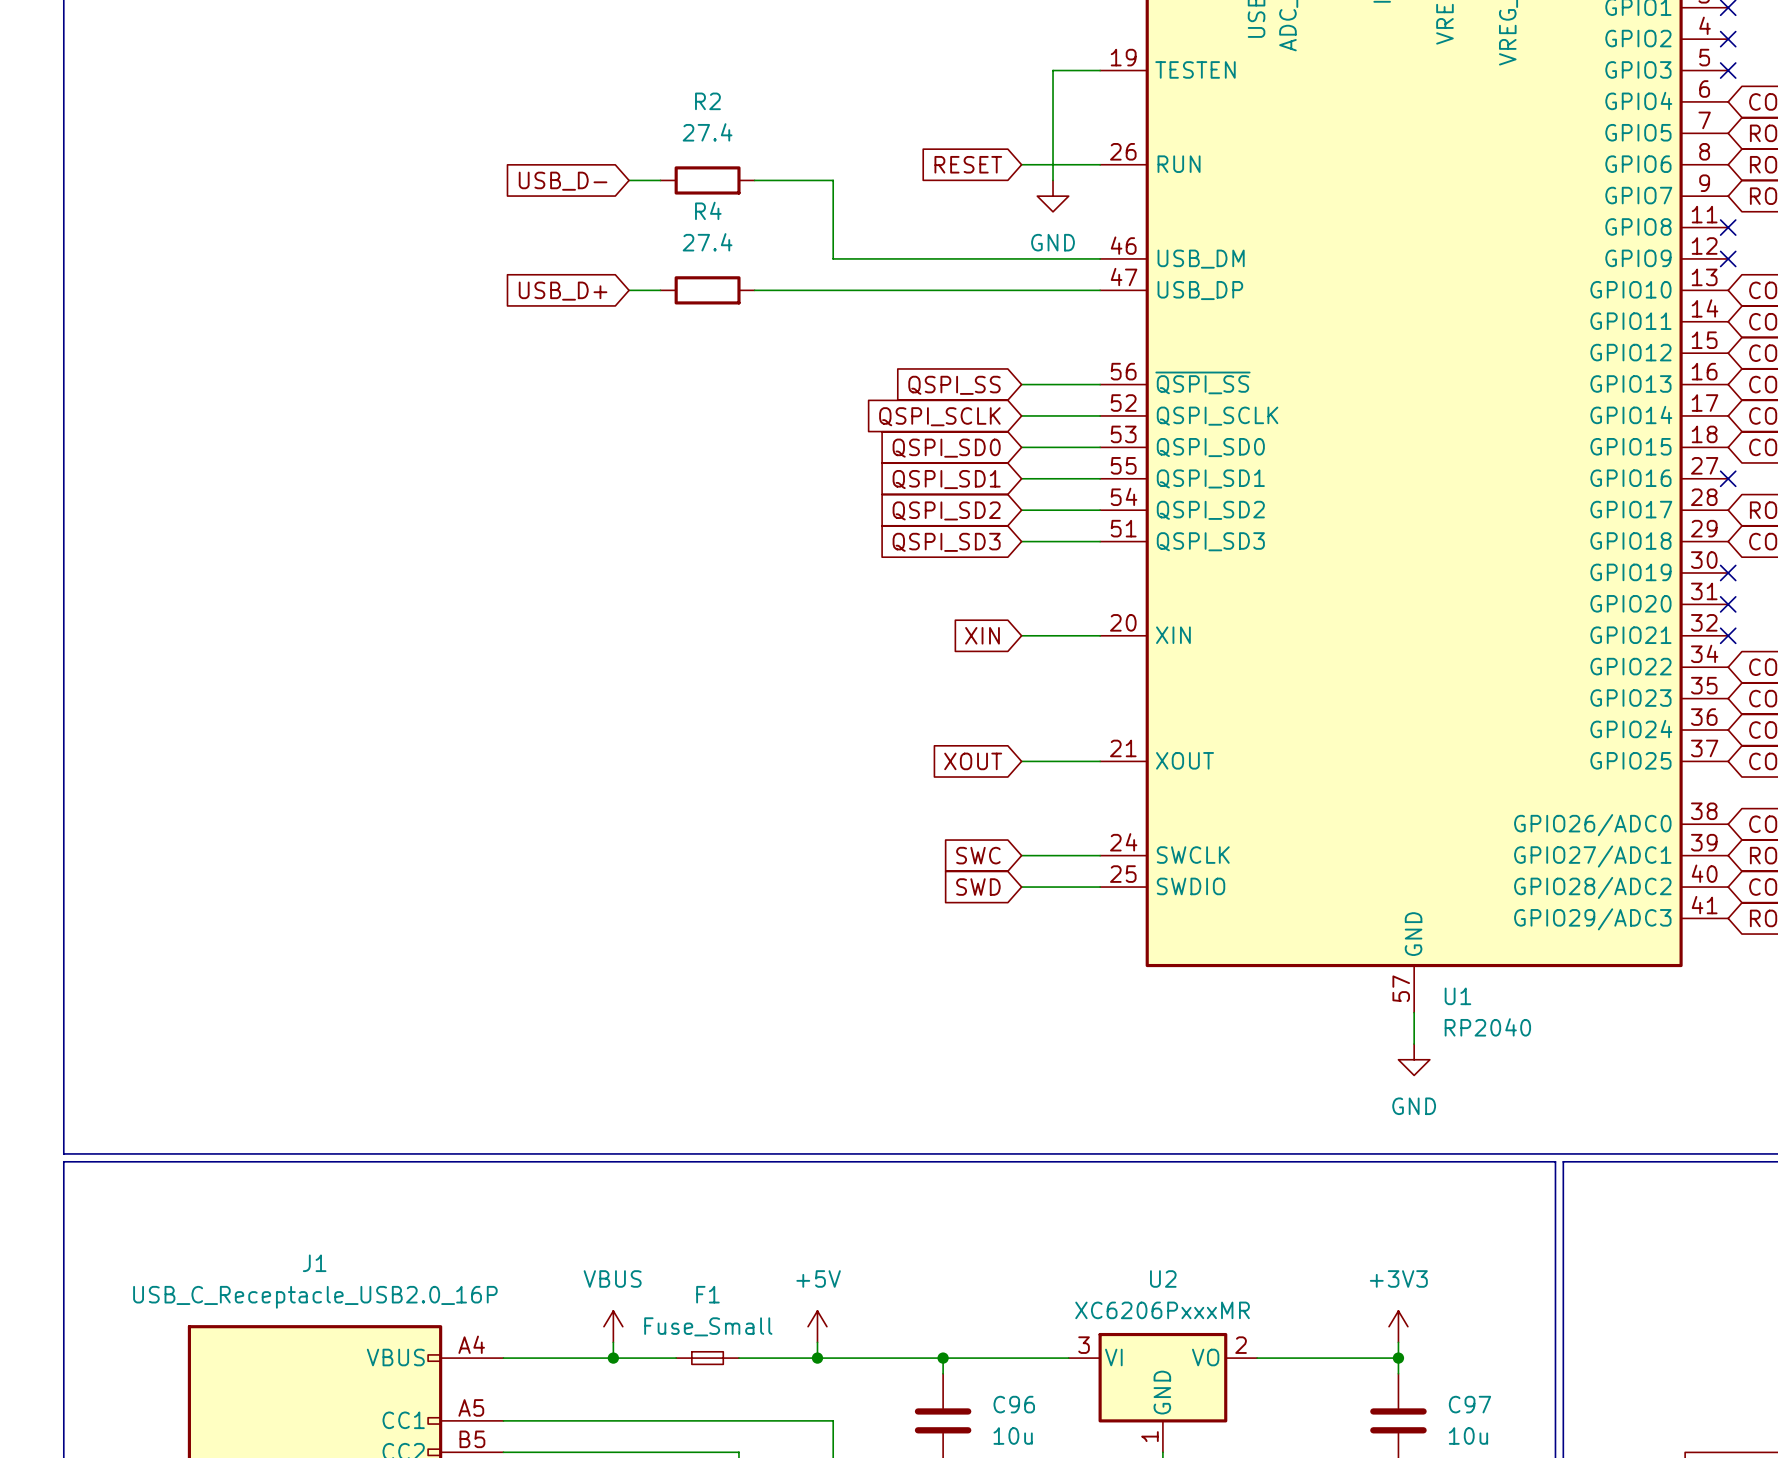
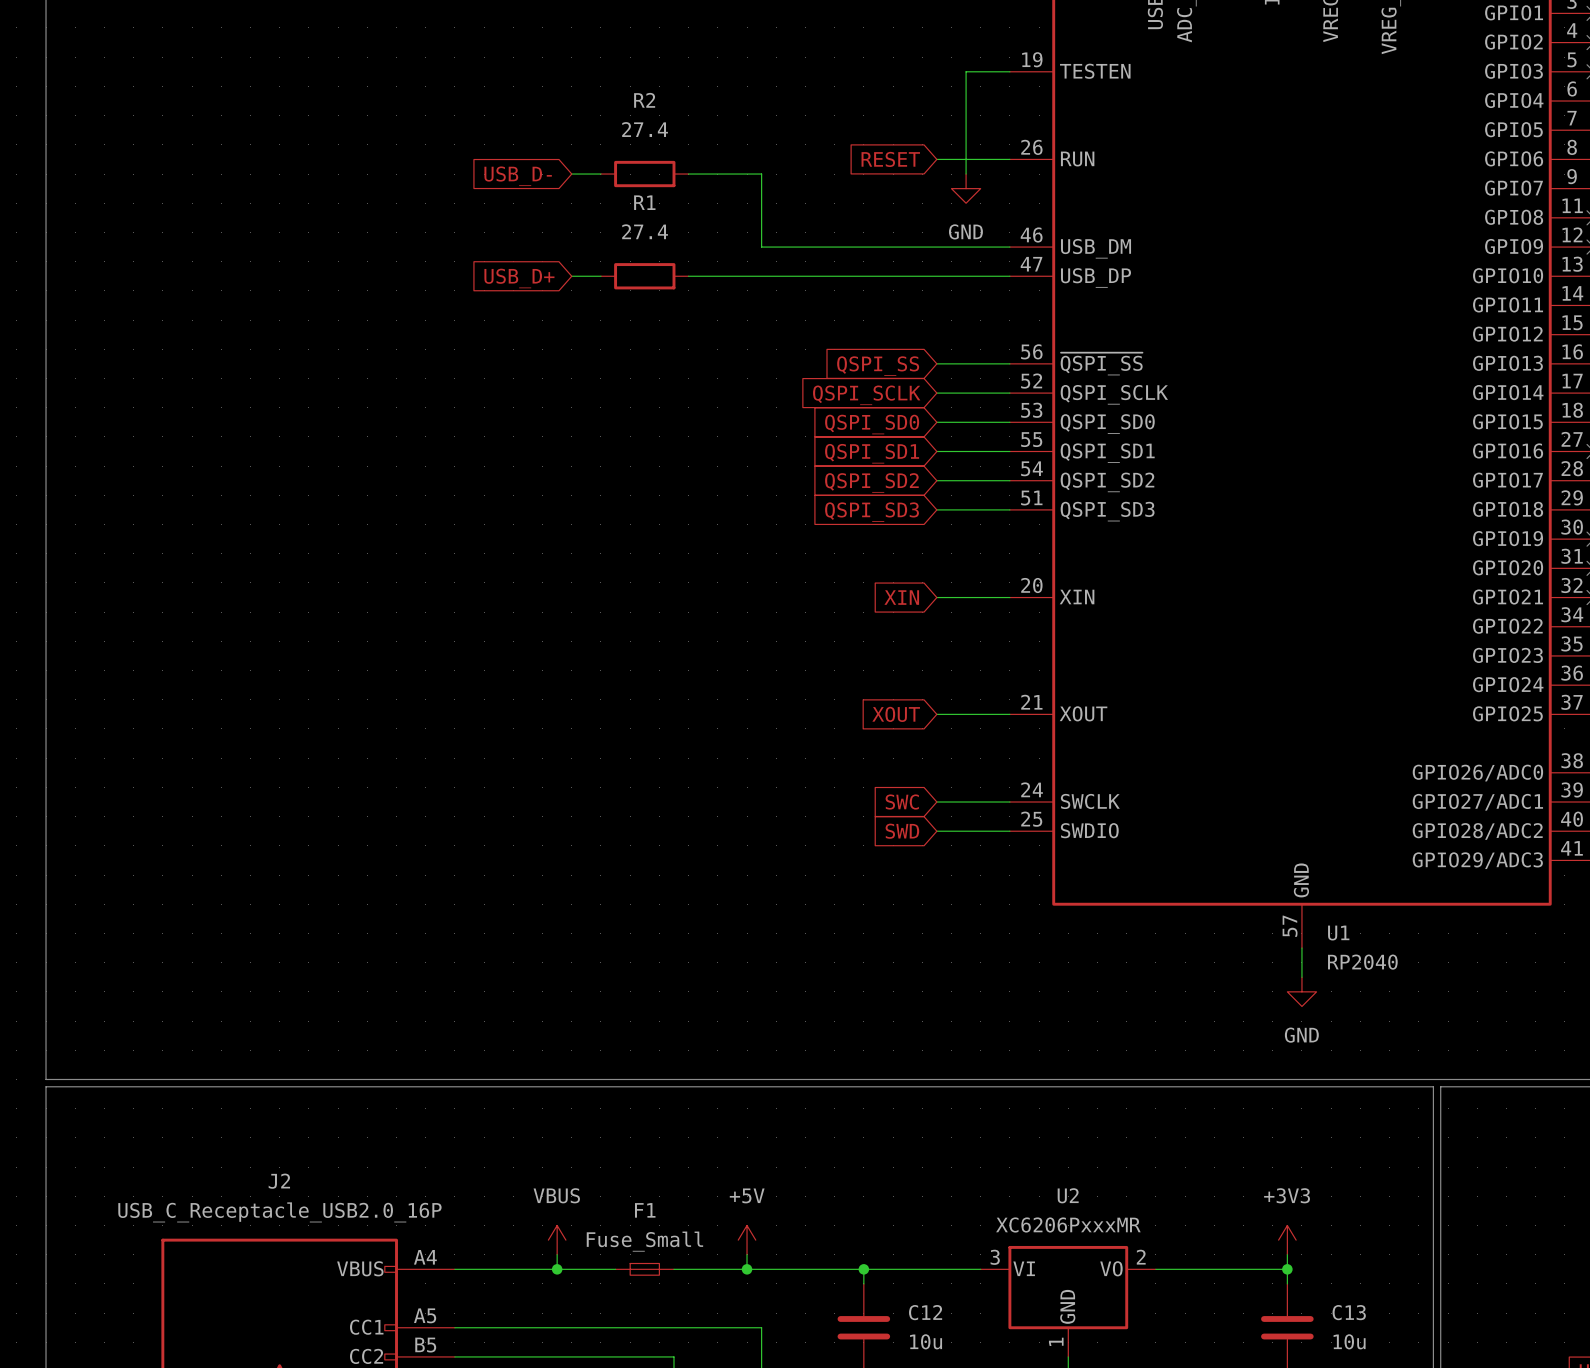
R4 name: R4 (708, 210) -> R1 (644, 202)
J1 name: J1 (314, 1263) -> J2 (279, 1181)
C96 name: C96 (1014, 1404) -> C12 (925, 1312)
C97 name: C97 (1469, 1404) -> C13 (1349, 1312)

